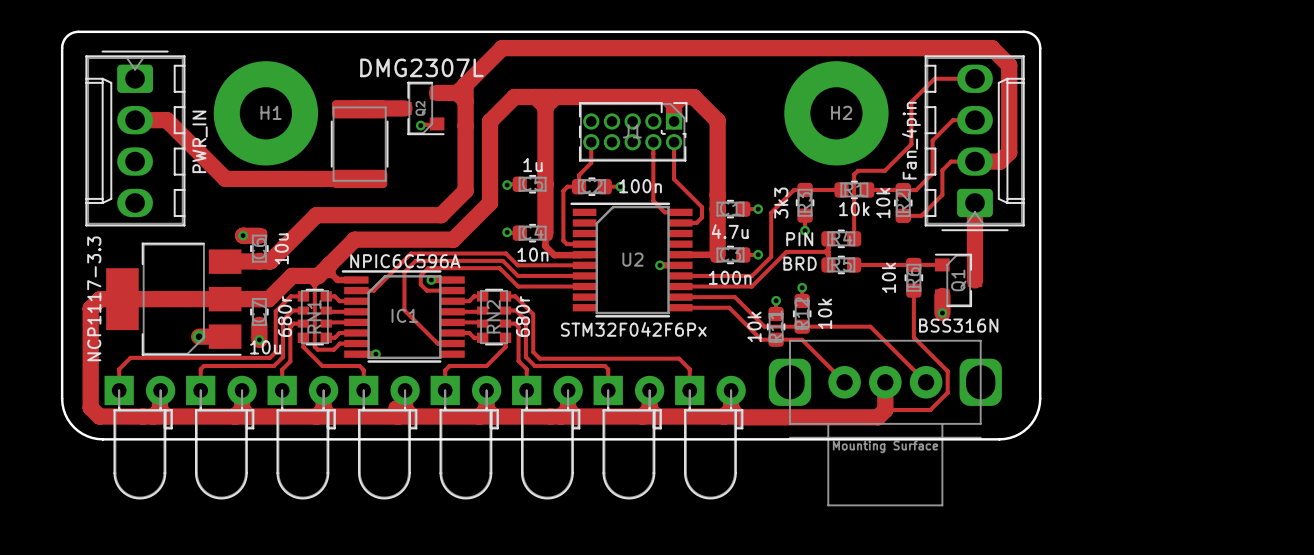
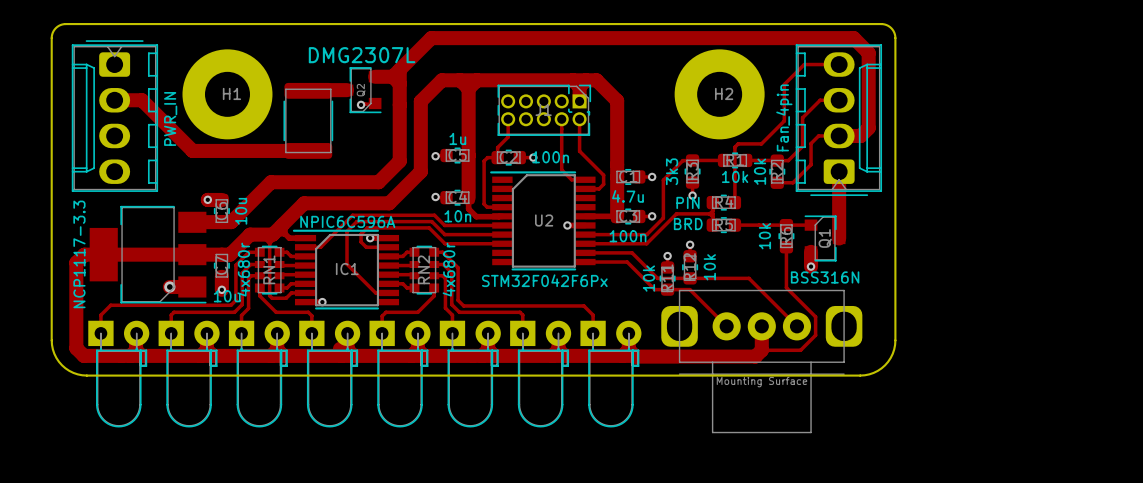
RN1 value: 680r (285, 316) -> 4x680r (243, 269)
RN2 value: 680r (523, 316) -> 4x680r (449, 269)

